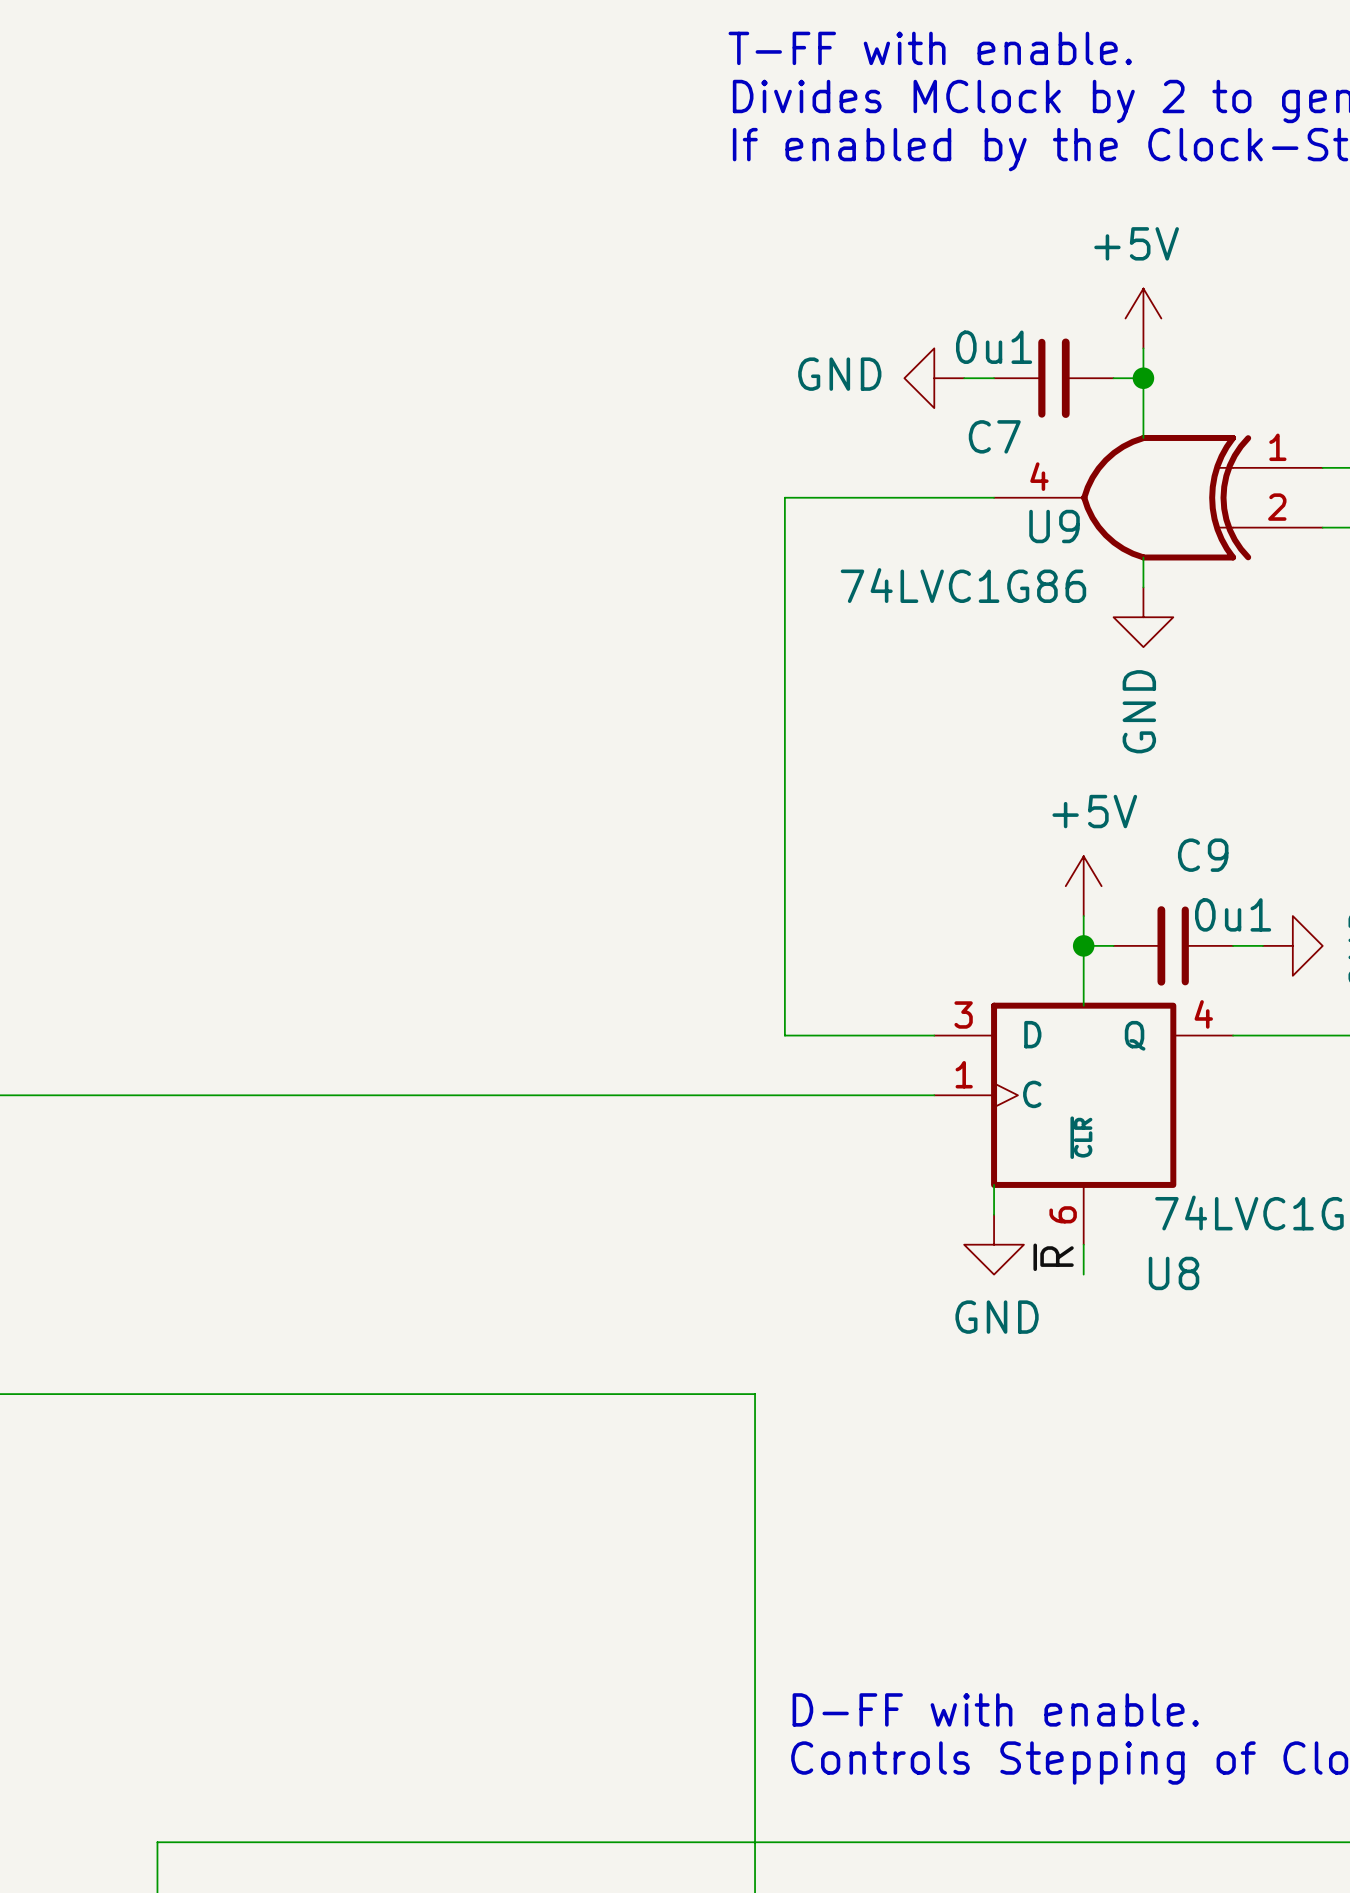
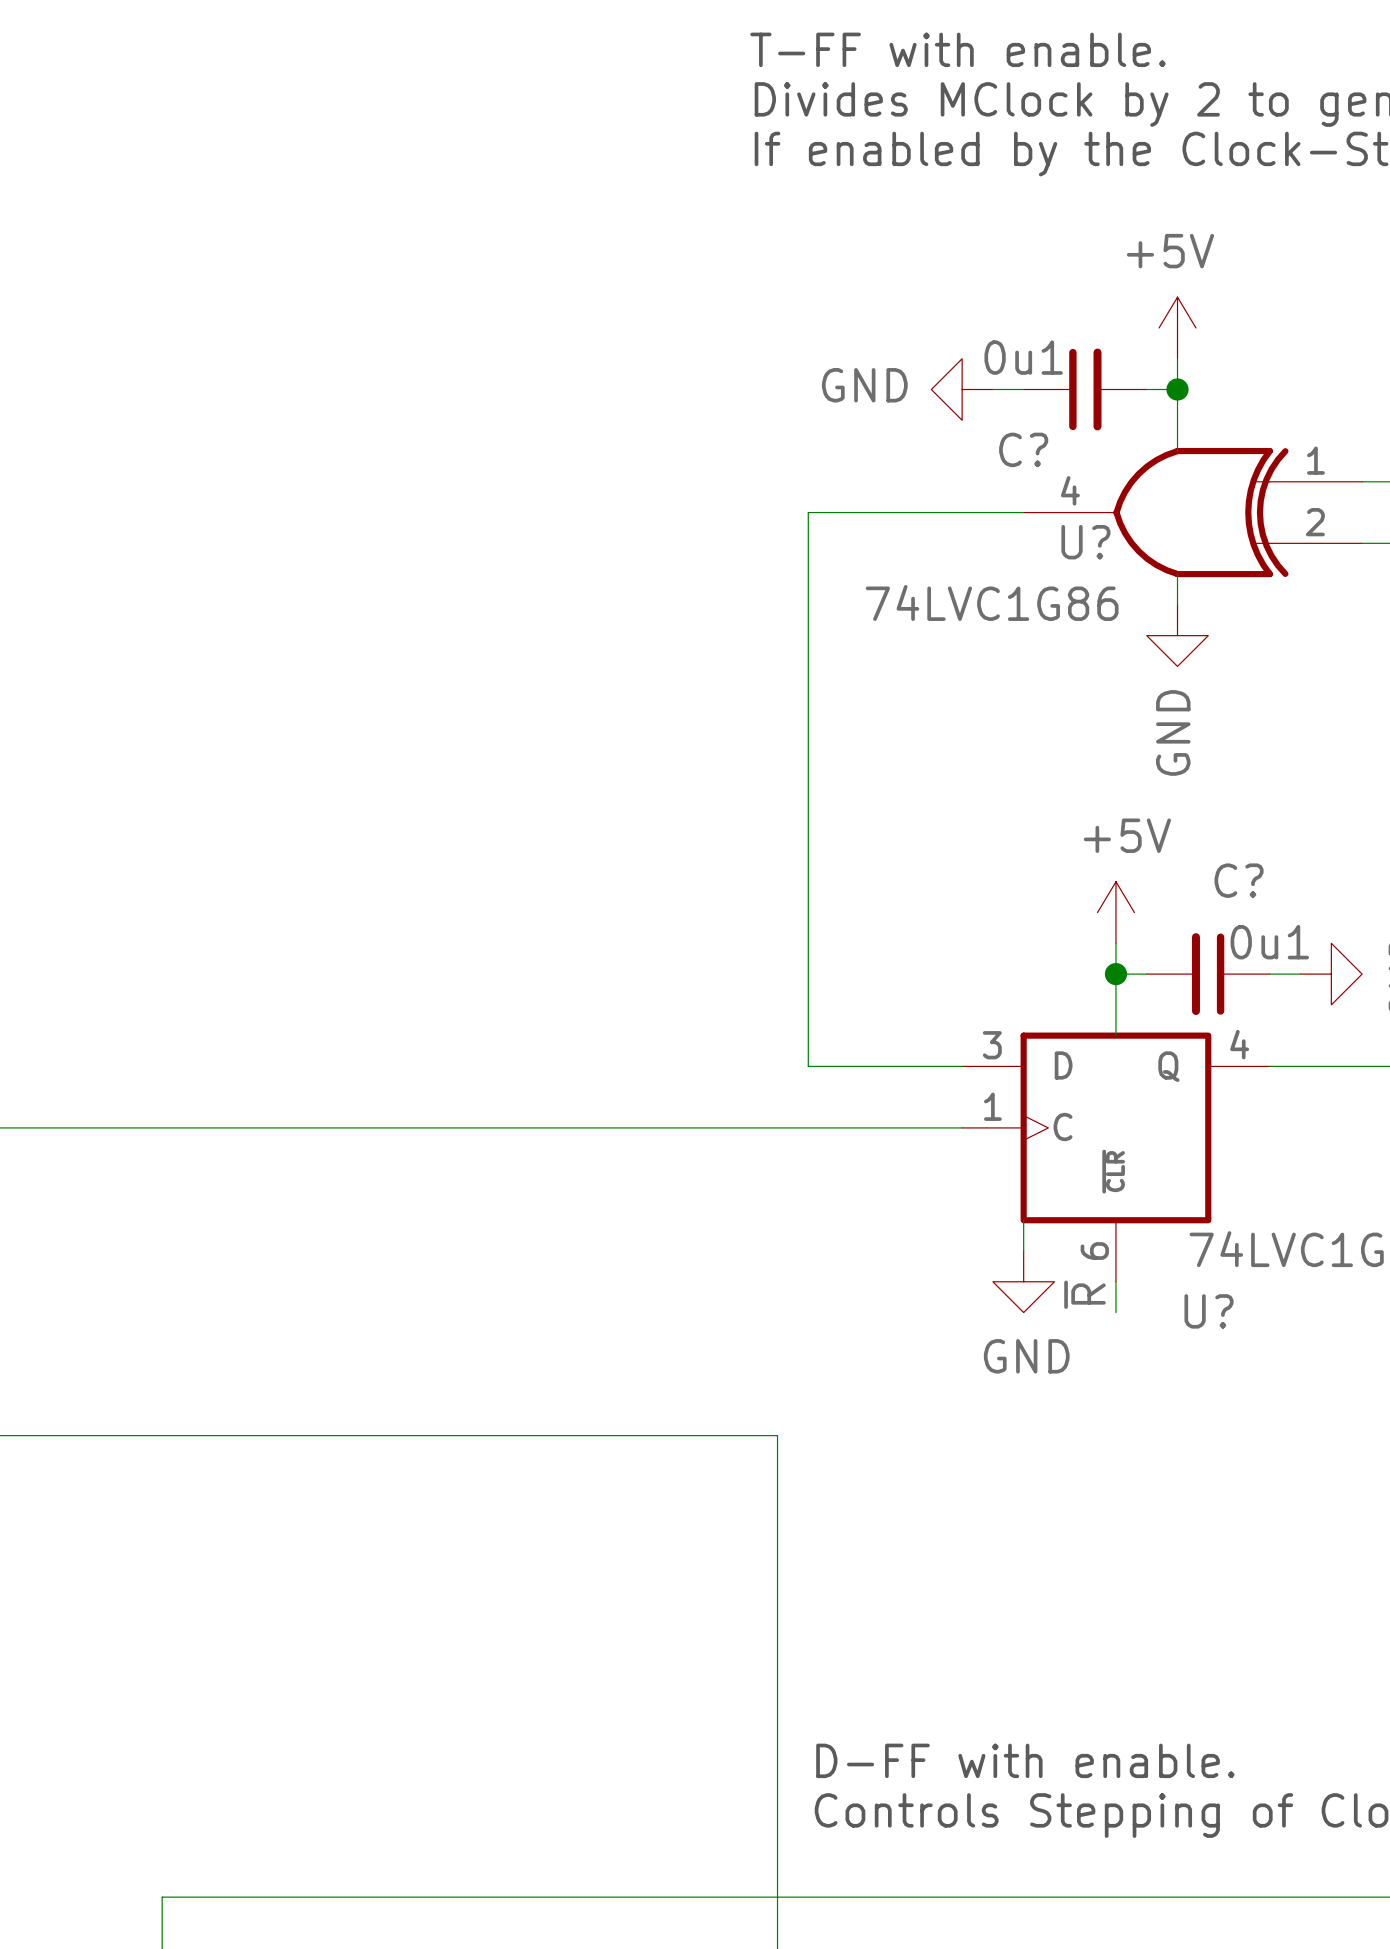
C7 name: C7 (994, 436) -> C? (1023, 449)
U9 name: U9 (1054, 526) -> U? (1085, 542)
C9 name: C9 (1203, 855) -> C? (1239, 880)
U8 name: U8 (1174, 1273) -> U? (1209, 1311)

